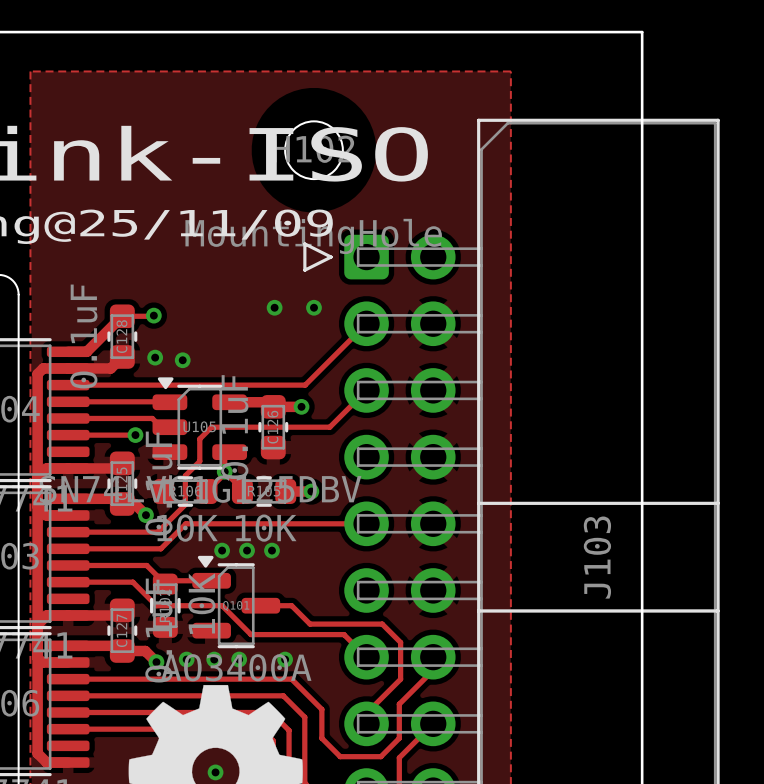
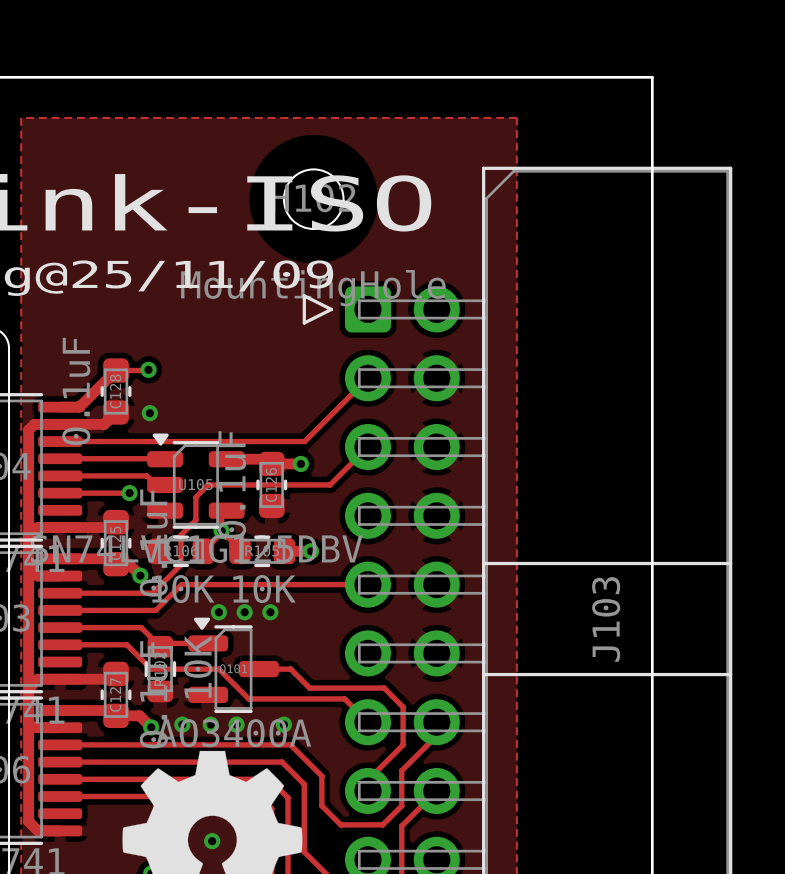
via: (274, 307) -> none
via: (313, 307) -> none
via: (182, 360) -> none

